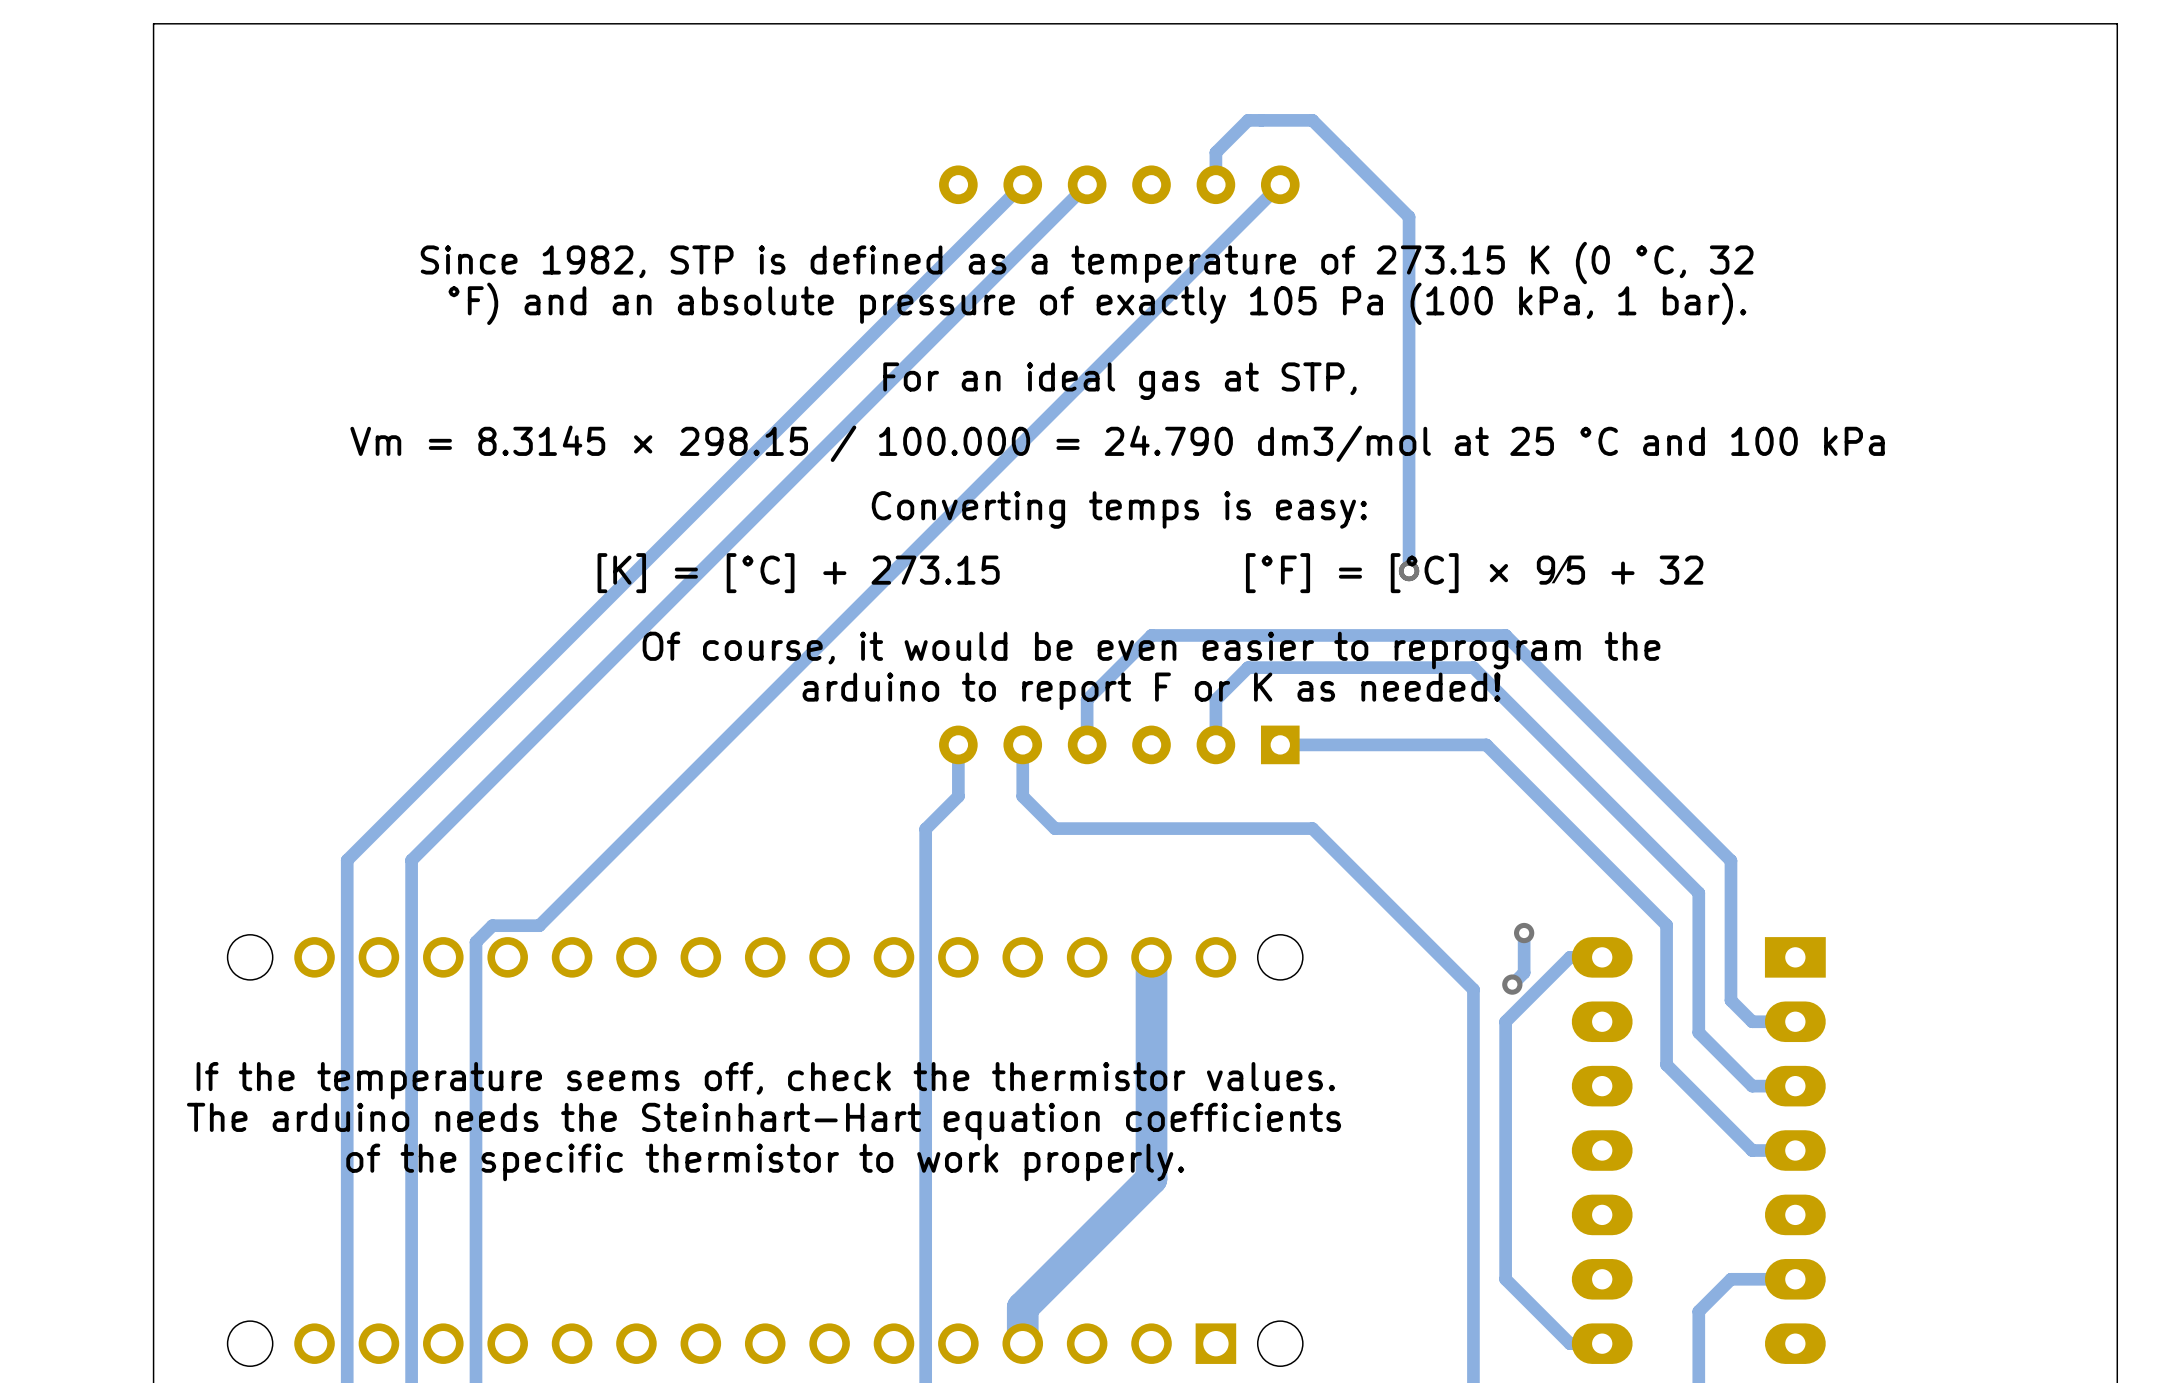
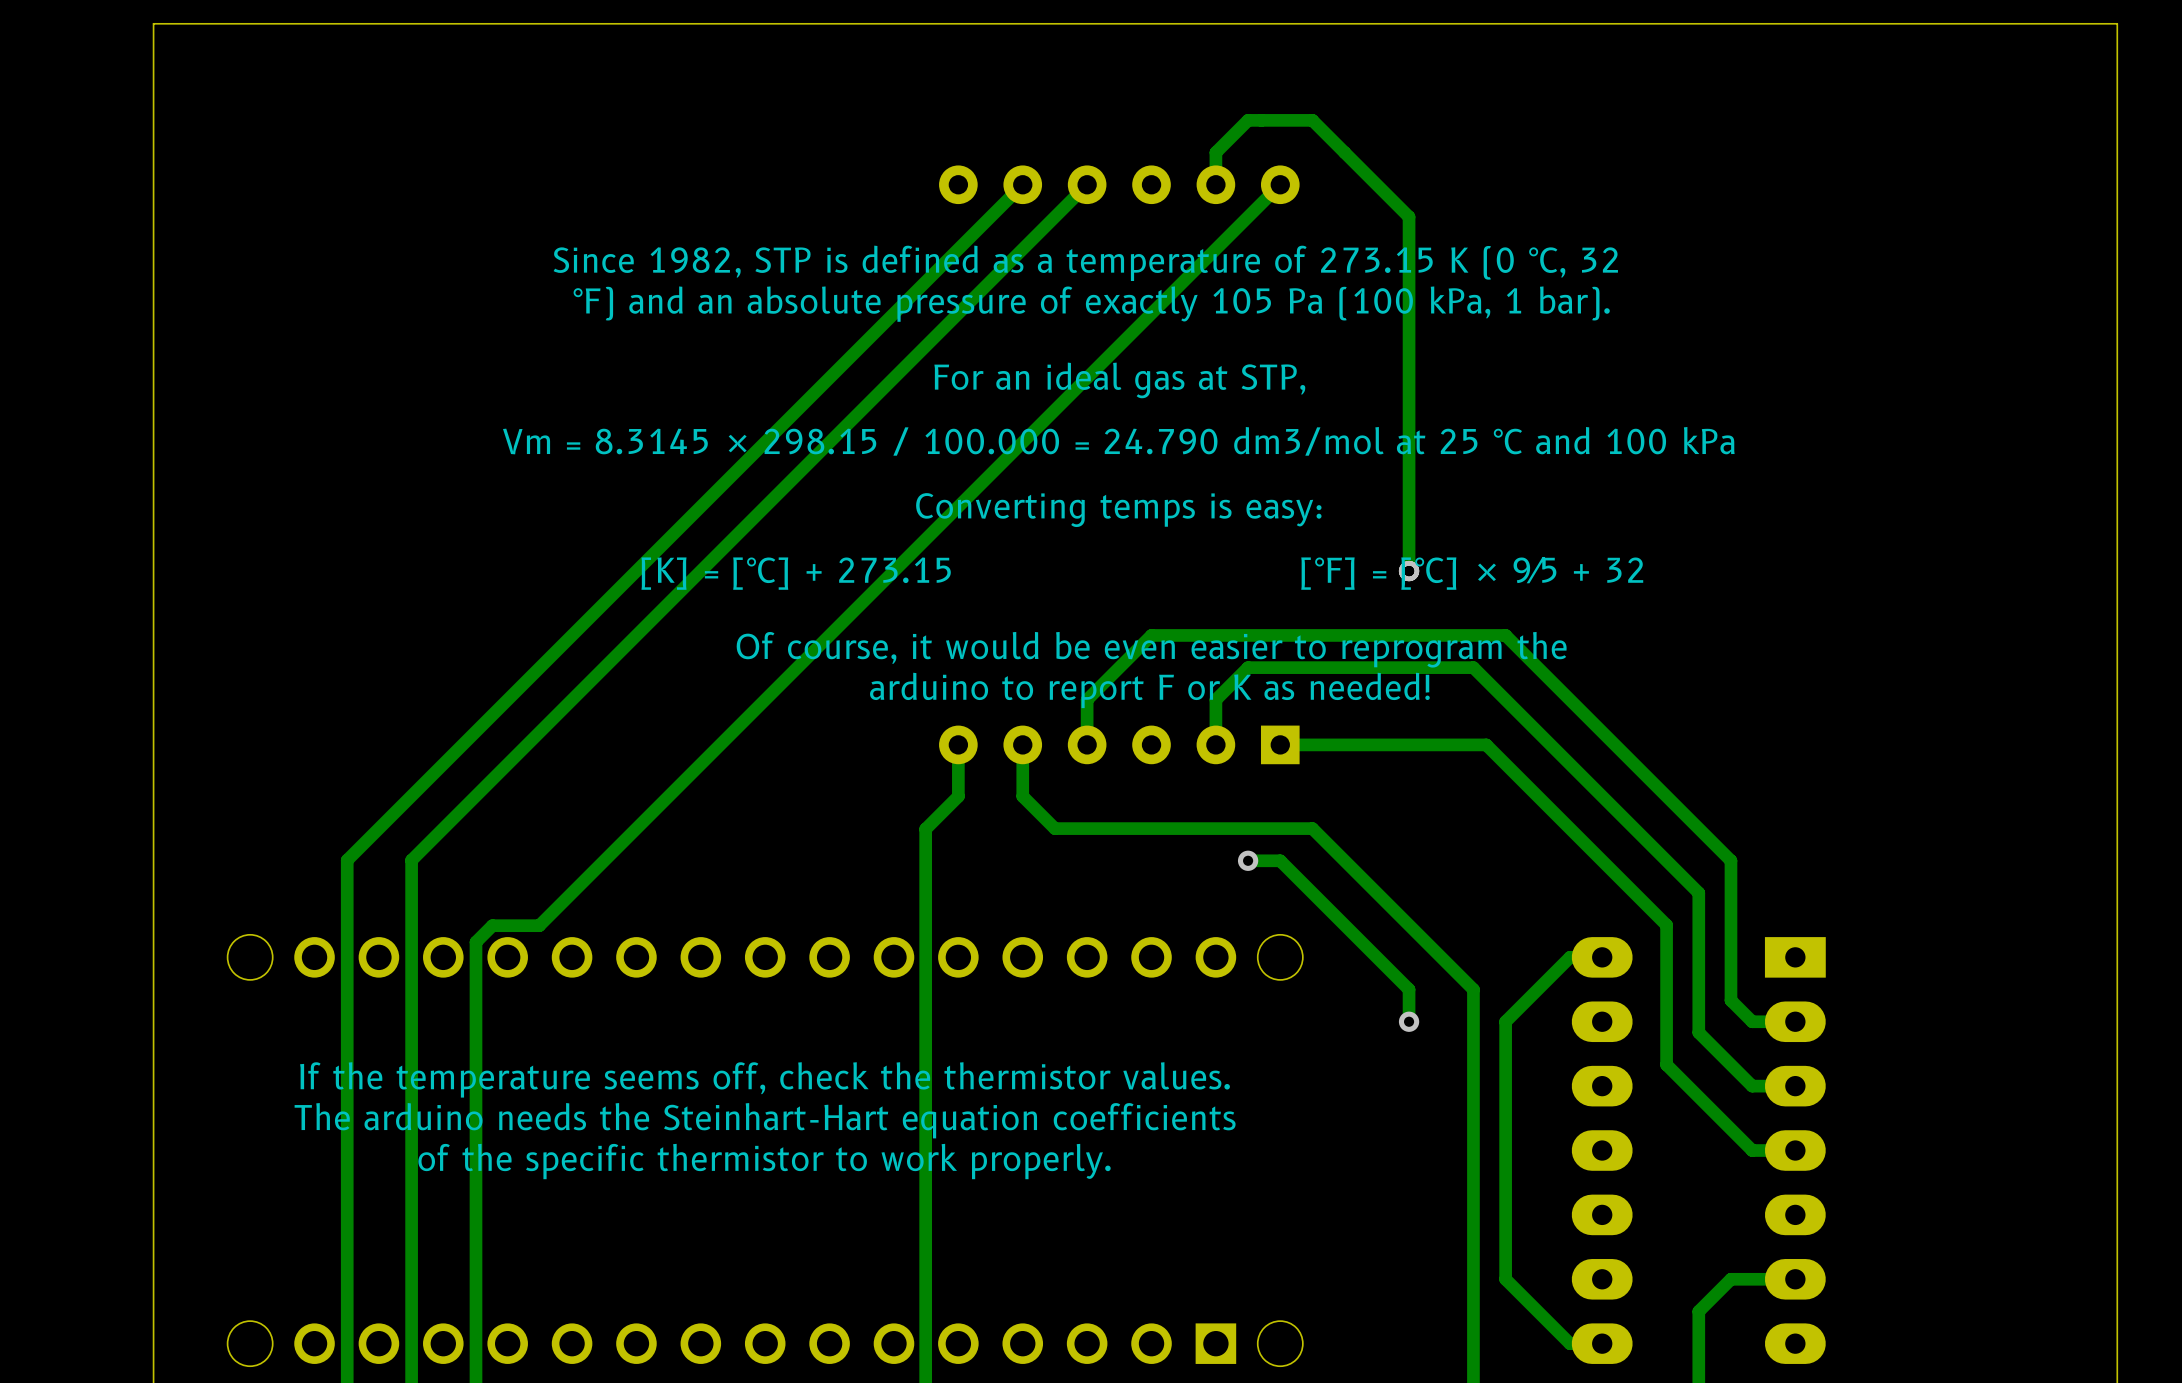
track: none -> (1248, 860) (1280, 860) (1409, 989) (1409, 1021)
via: none -> (1248, 860)
track: (1524, 933) (1524, 972) (1512, 984) -> none
via: (1524, 933) -> none
track: (1151, 957) (1151, 1178) (1022, 1307) (1022, 1343) -> none
via: (1512, 984) -> none
via: none -> (1409, 1021)

